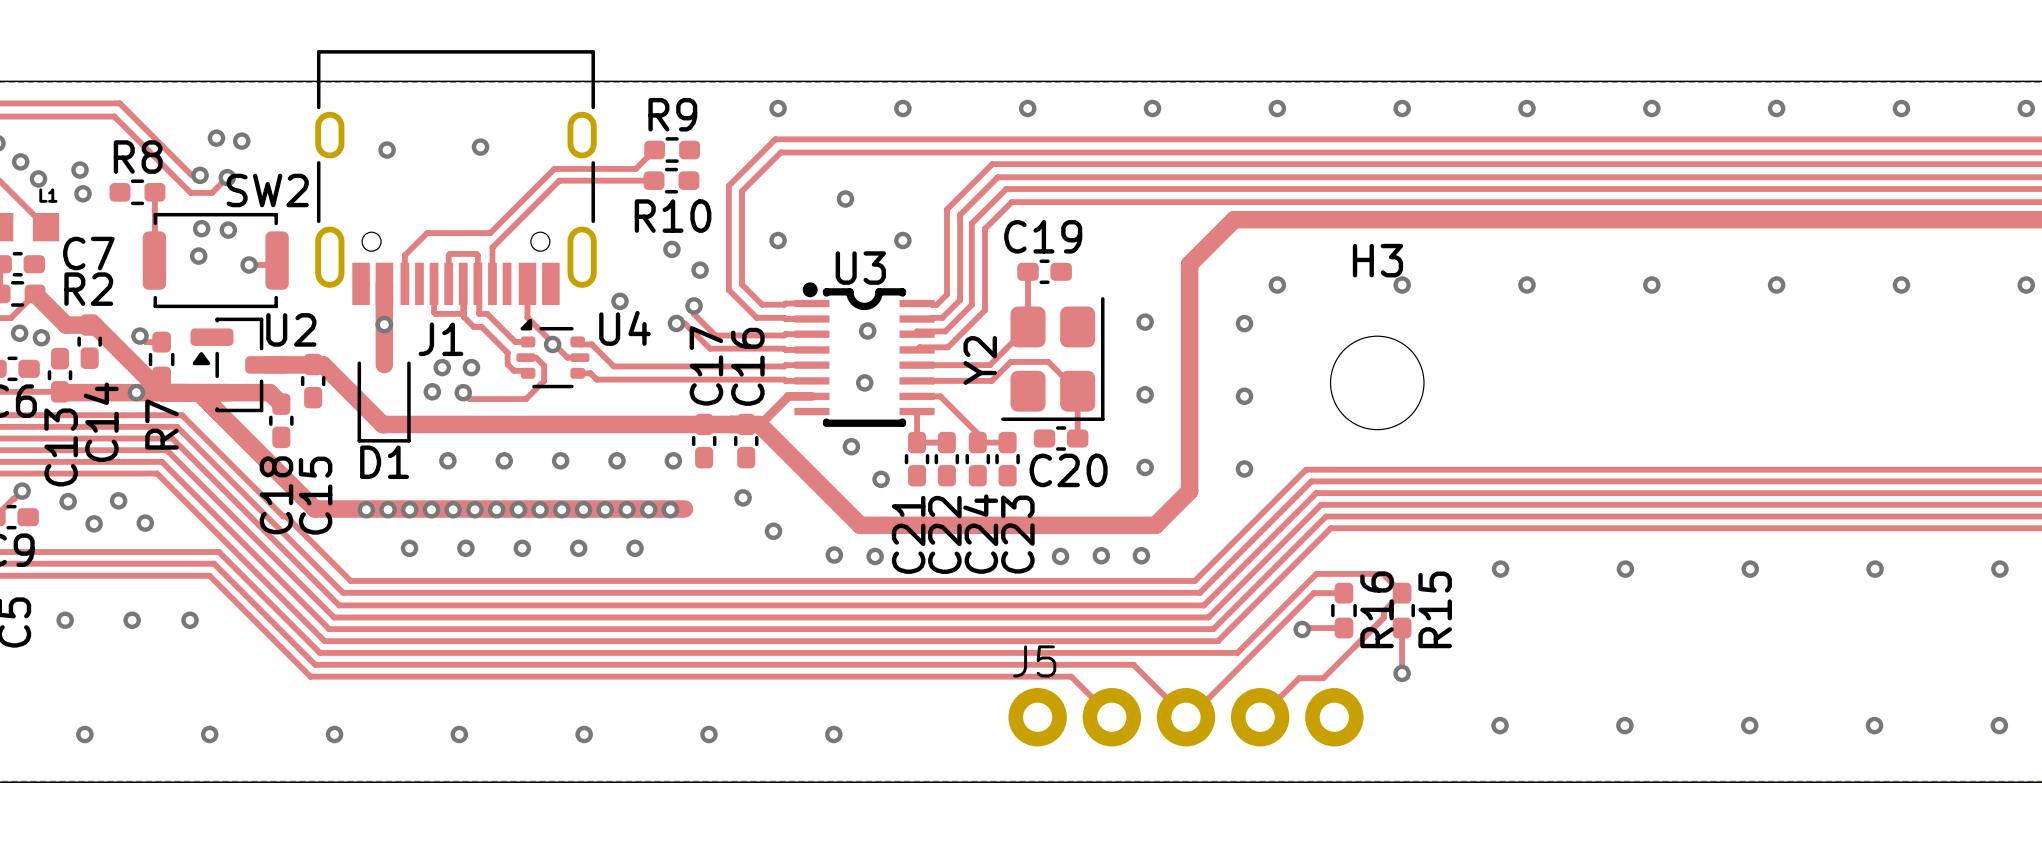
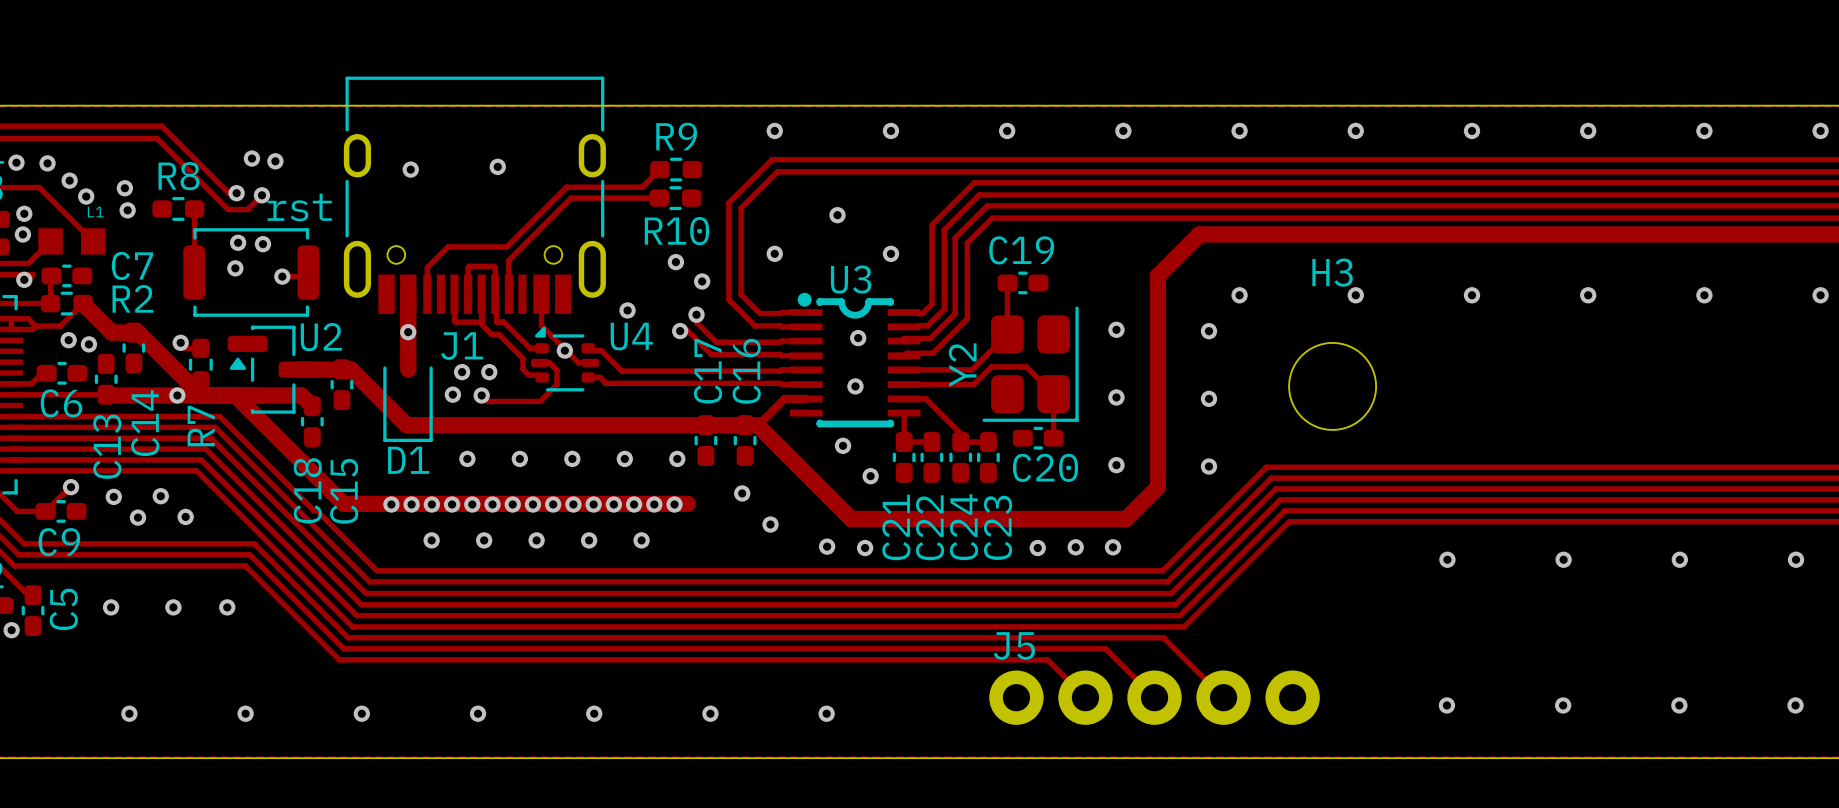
SW2 name: SW2 (267, 190) -> rst (299, 207)
track: (1343, 593) (1313, 593) (1189, 717) (1185, 717) -> none
R16: (1343, 610) -> none
R15: (1402, 610) -> none
track: (1343, 628) (1302, 629) -> none
track: (1402, 628) (1402, 673) -> none
via: (1302, 629) -> none
track: (1195, 652) (1237, 652) (1316, 573) (1382, 573) (1402, 593) (1383, 611) (1383, 617) (1323, 678) (1299, 678) (1260, 717) -> (1163, 637) (1223, 697)
via: (1402, 673) -> none

